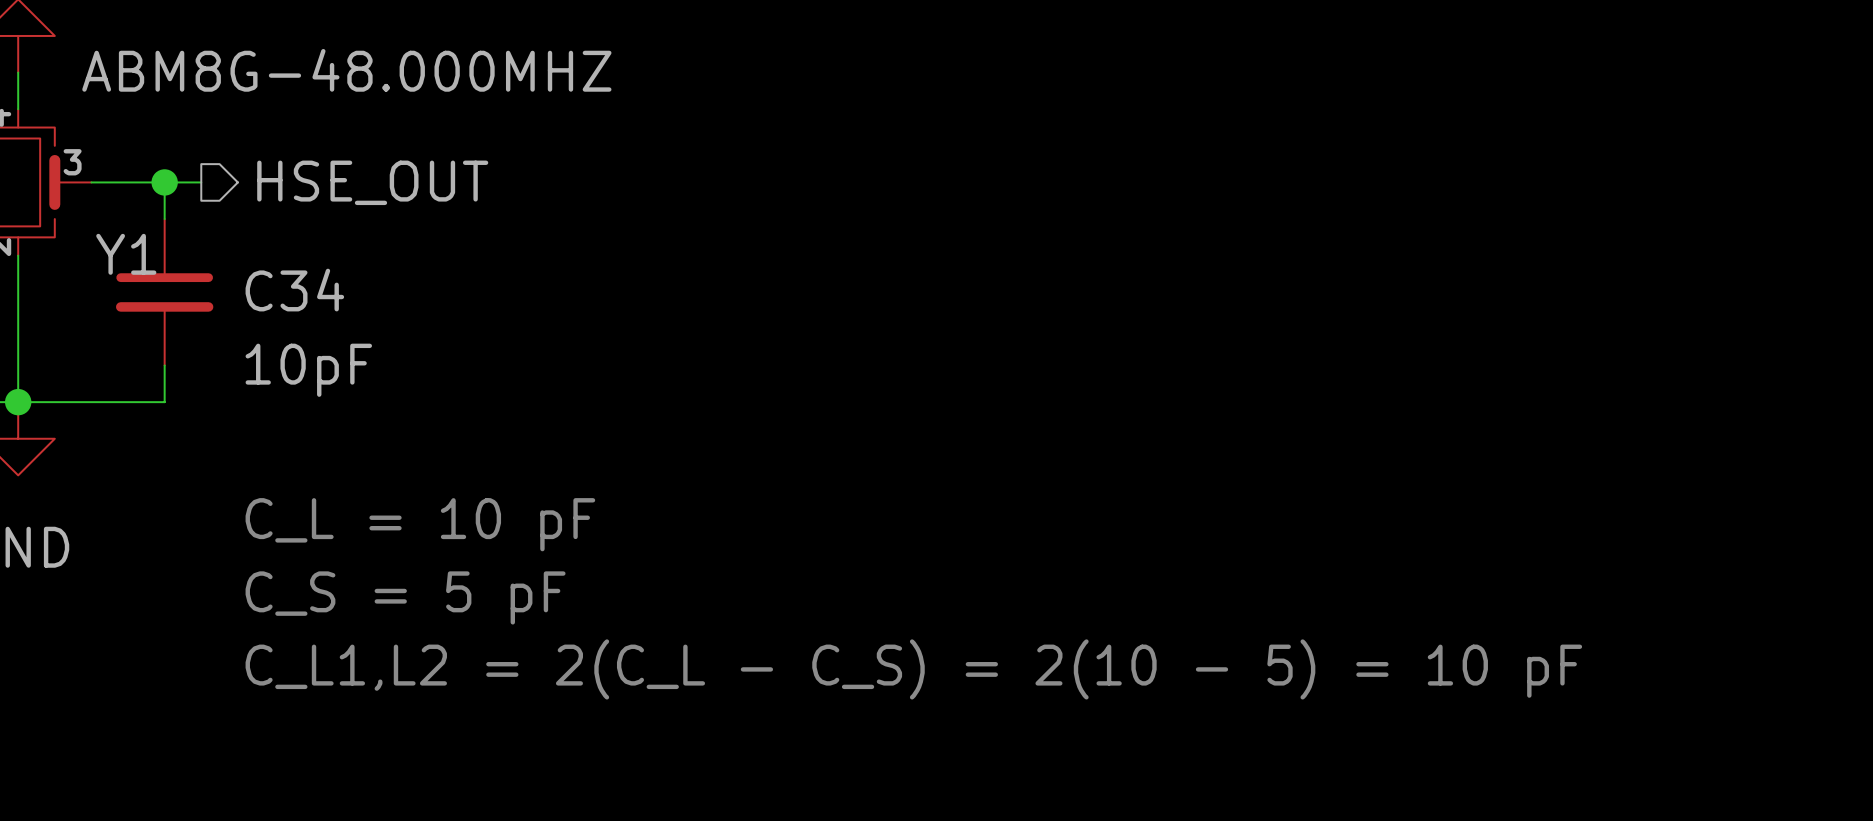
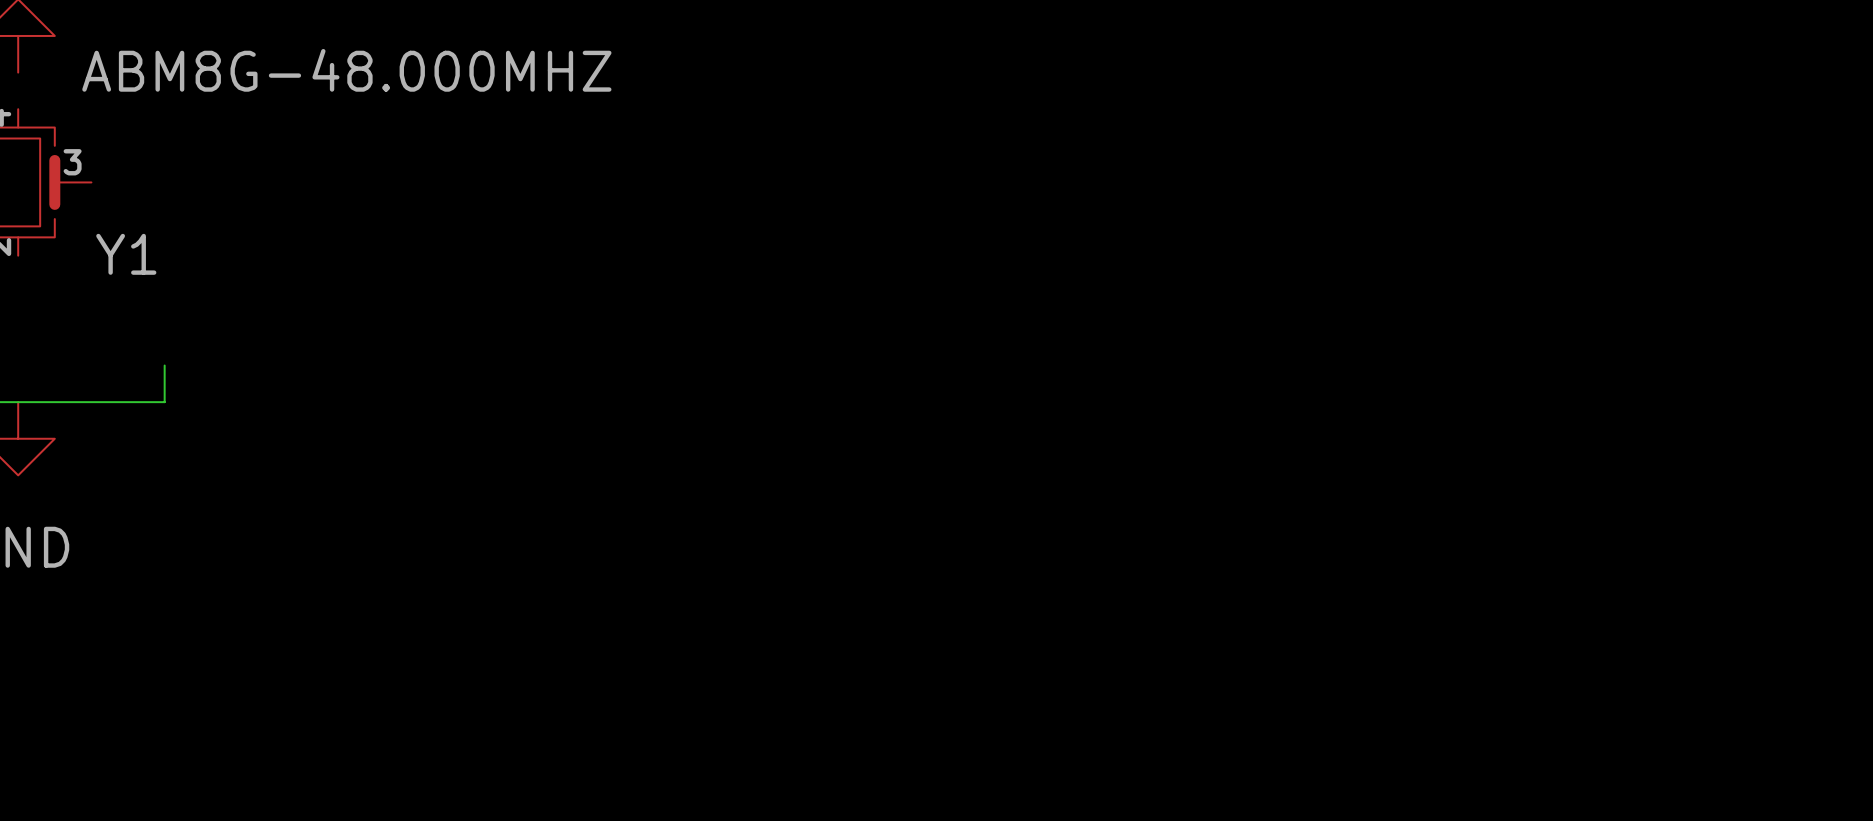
wire: (18, 72) (18, 109) -> none
wire: (91, 182) (201, 182) -> none
wire: (164, 182) (164, 219) -> none
junction: (164, 182) -> none
hierarchical label: HSE_OUT (372, 182) -> none
wire: (18, 255) (18, 402) -> none
C34: 10pF (164, 292) -> none
junction: (18, 402) -> none
text: C_L = 10 pF (420, 524) -> none
text: C_S = 5 pF (405, 597) -> none
text: C_L1,L2 = 2(C_L - C_S) = 2(10 - 5) = 10 pF (913, 669) -> none

